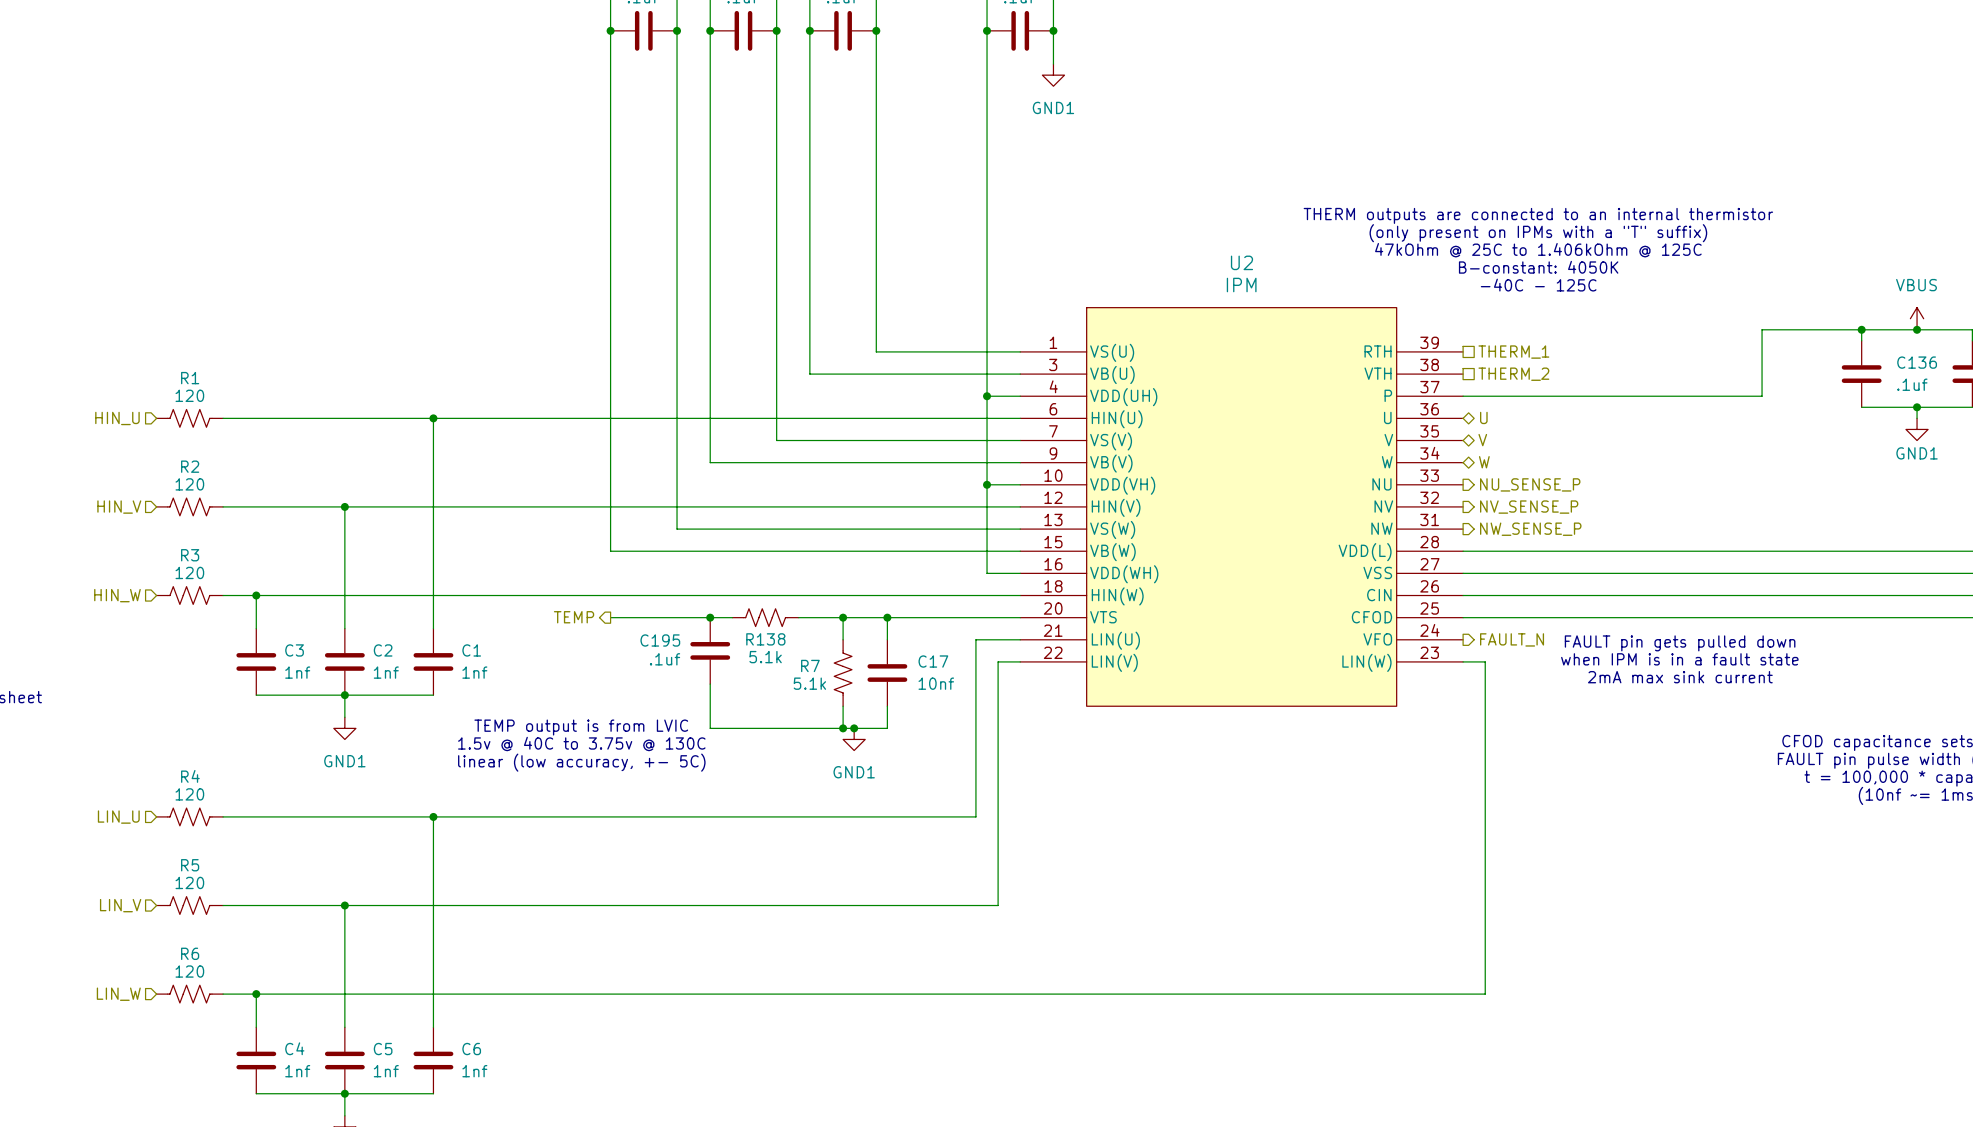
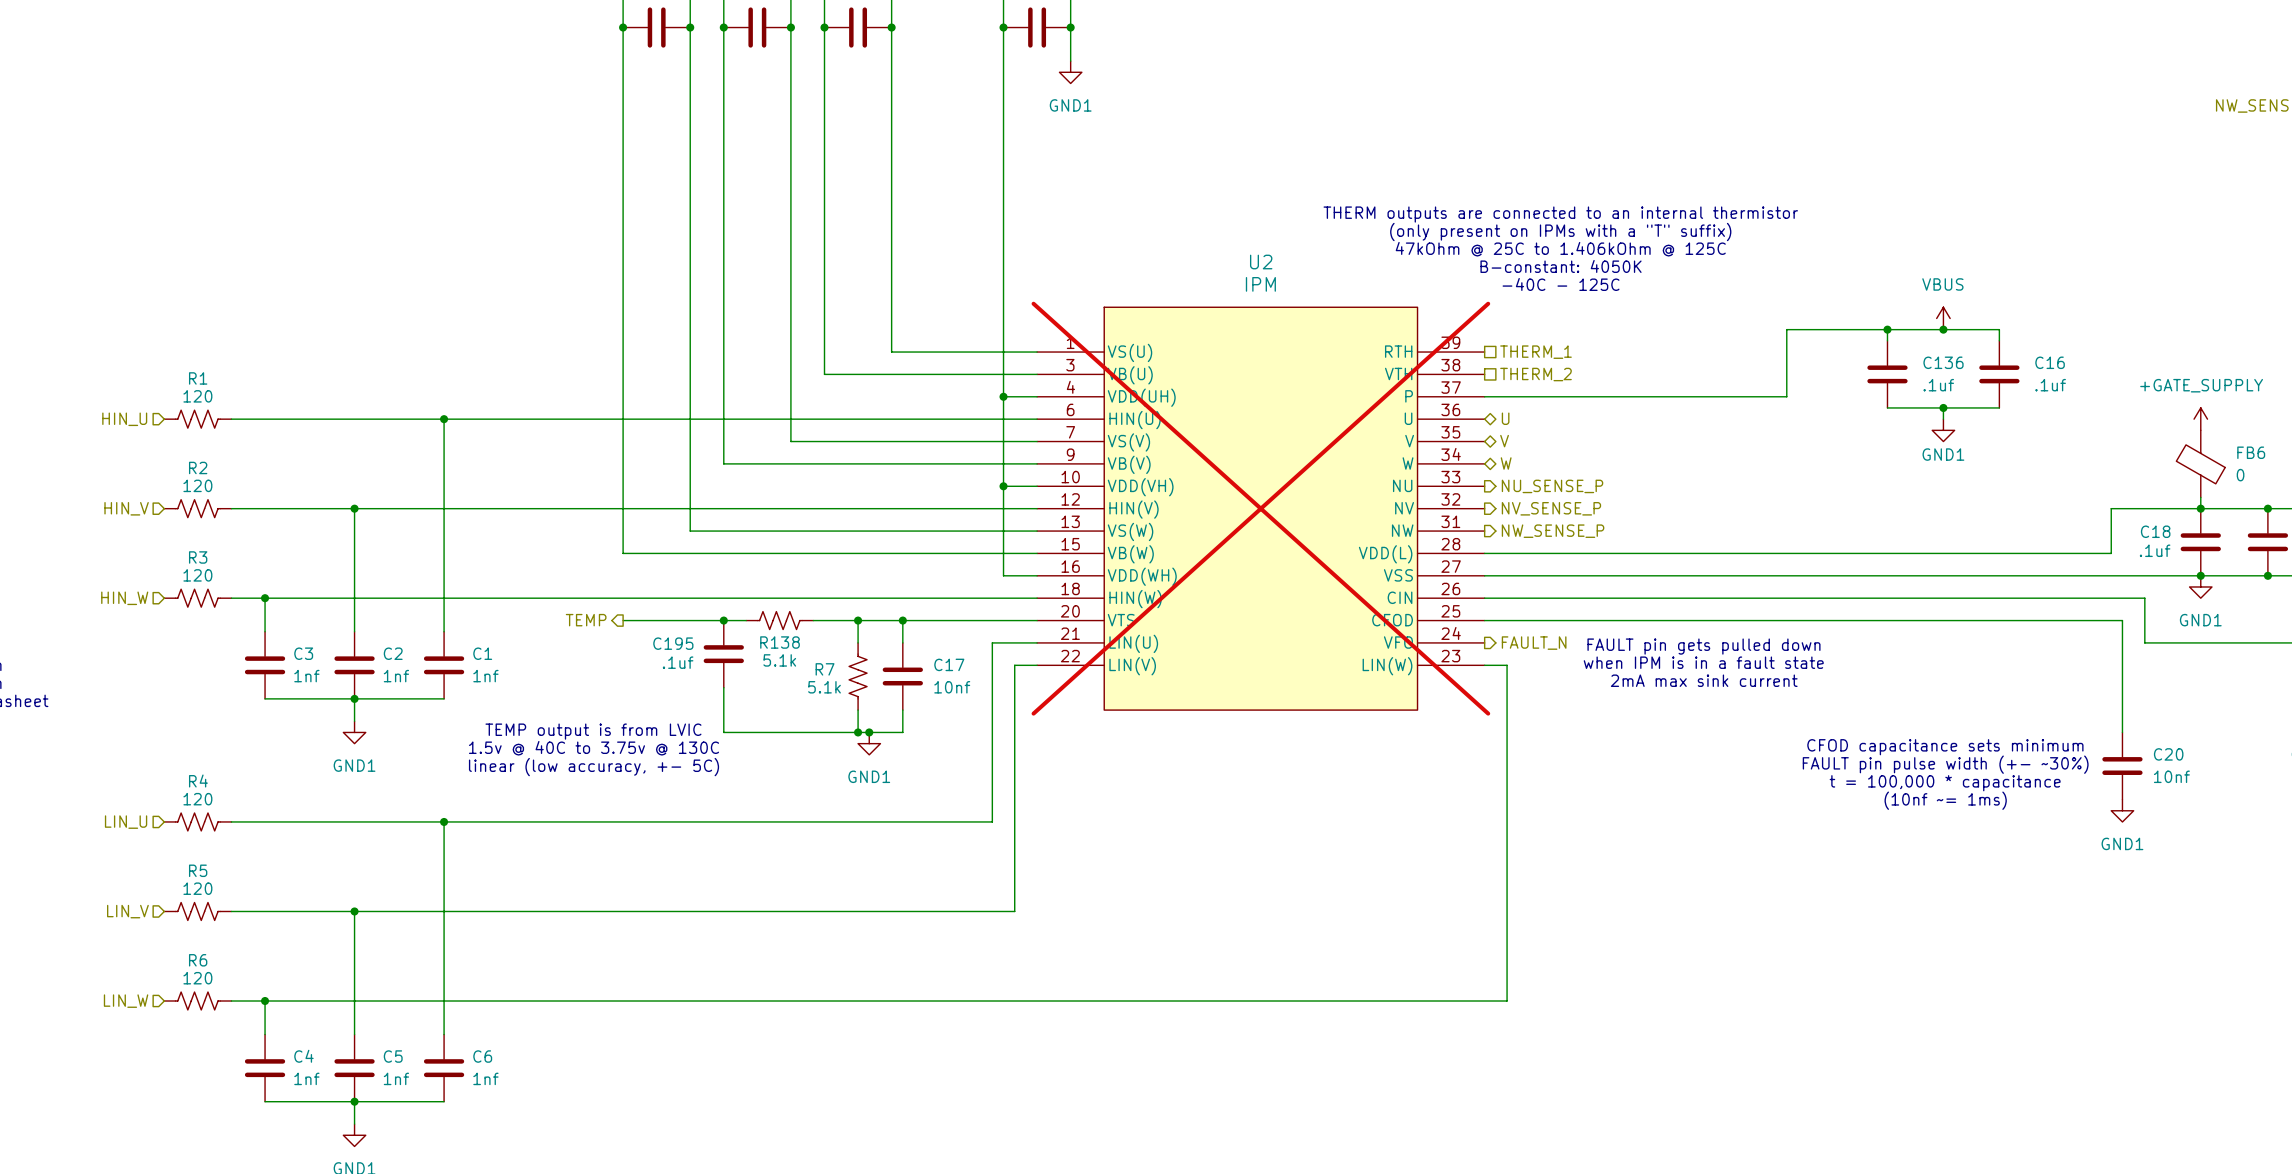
U2 do-not-place cross: none -> (1260, 508)

